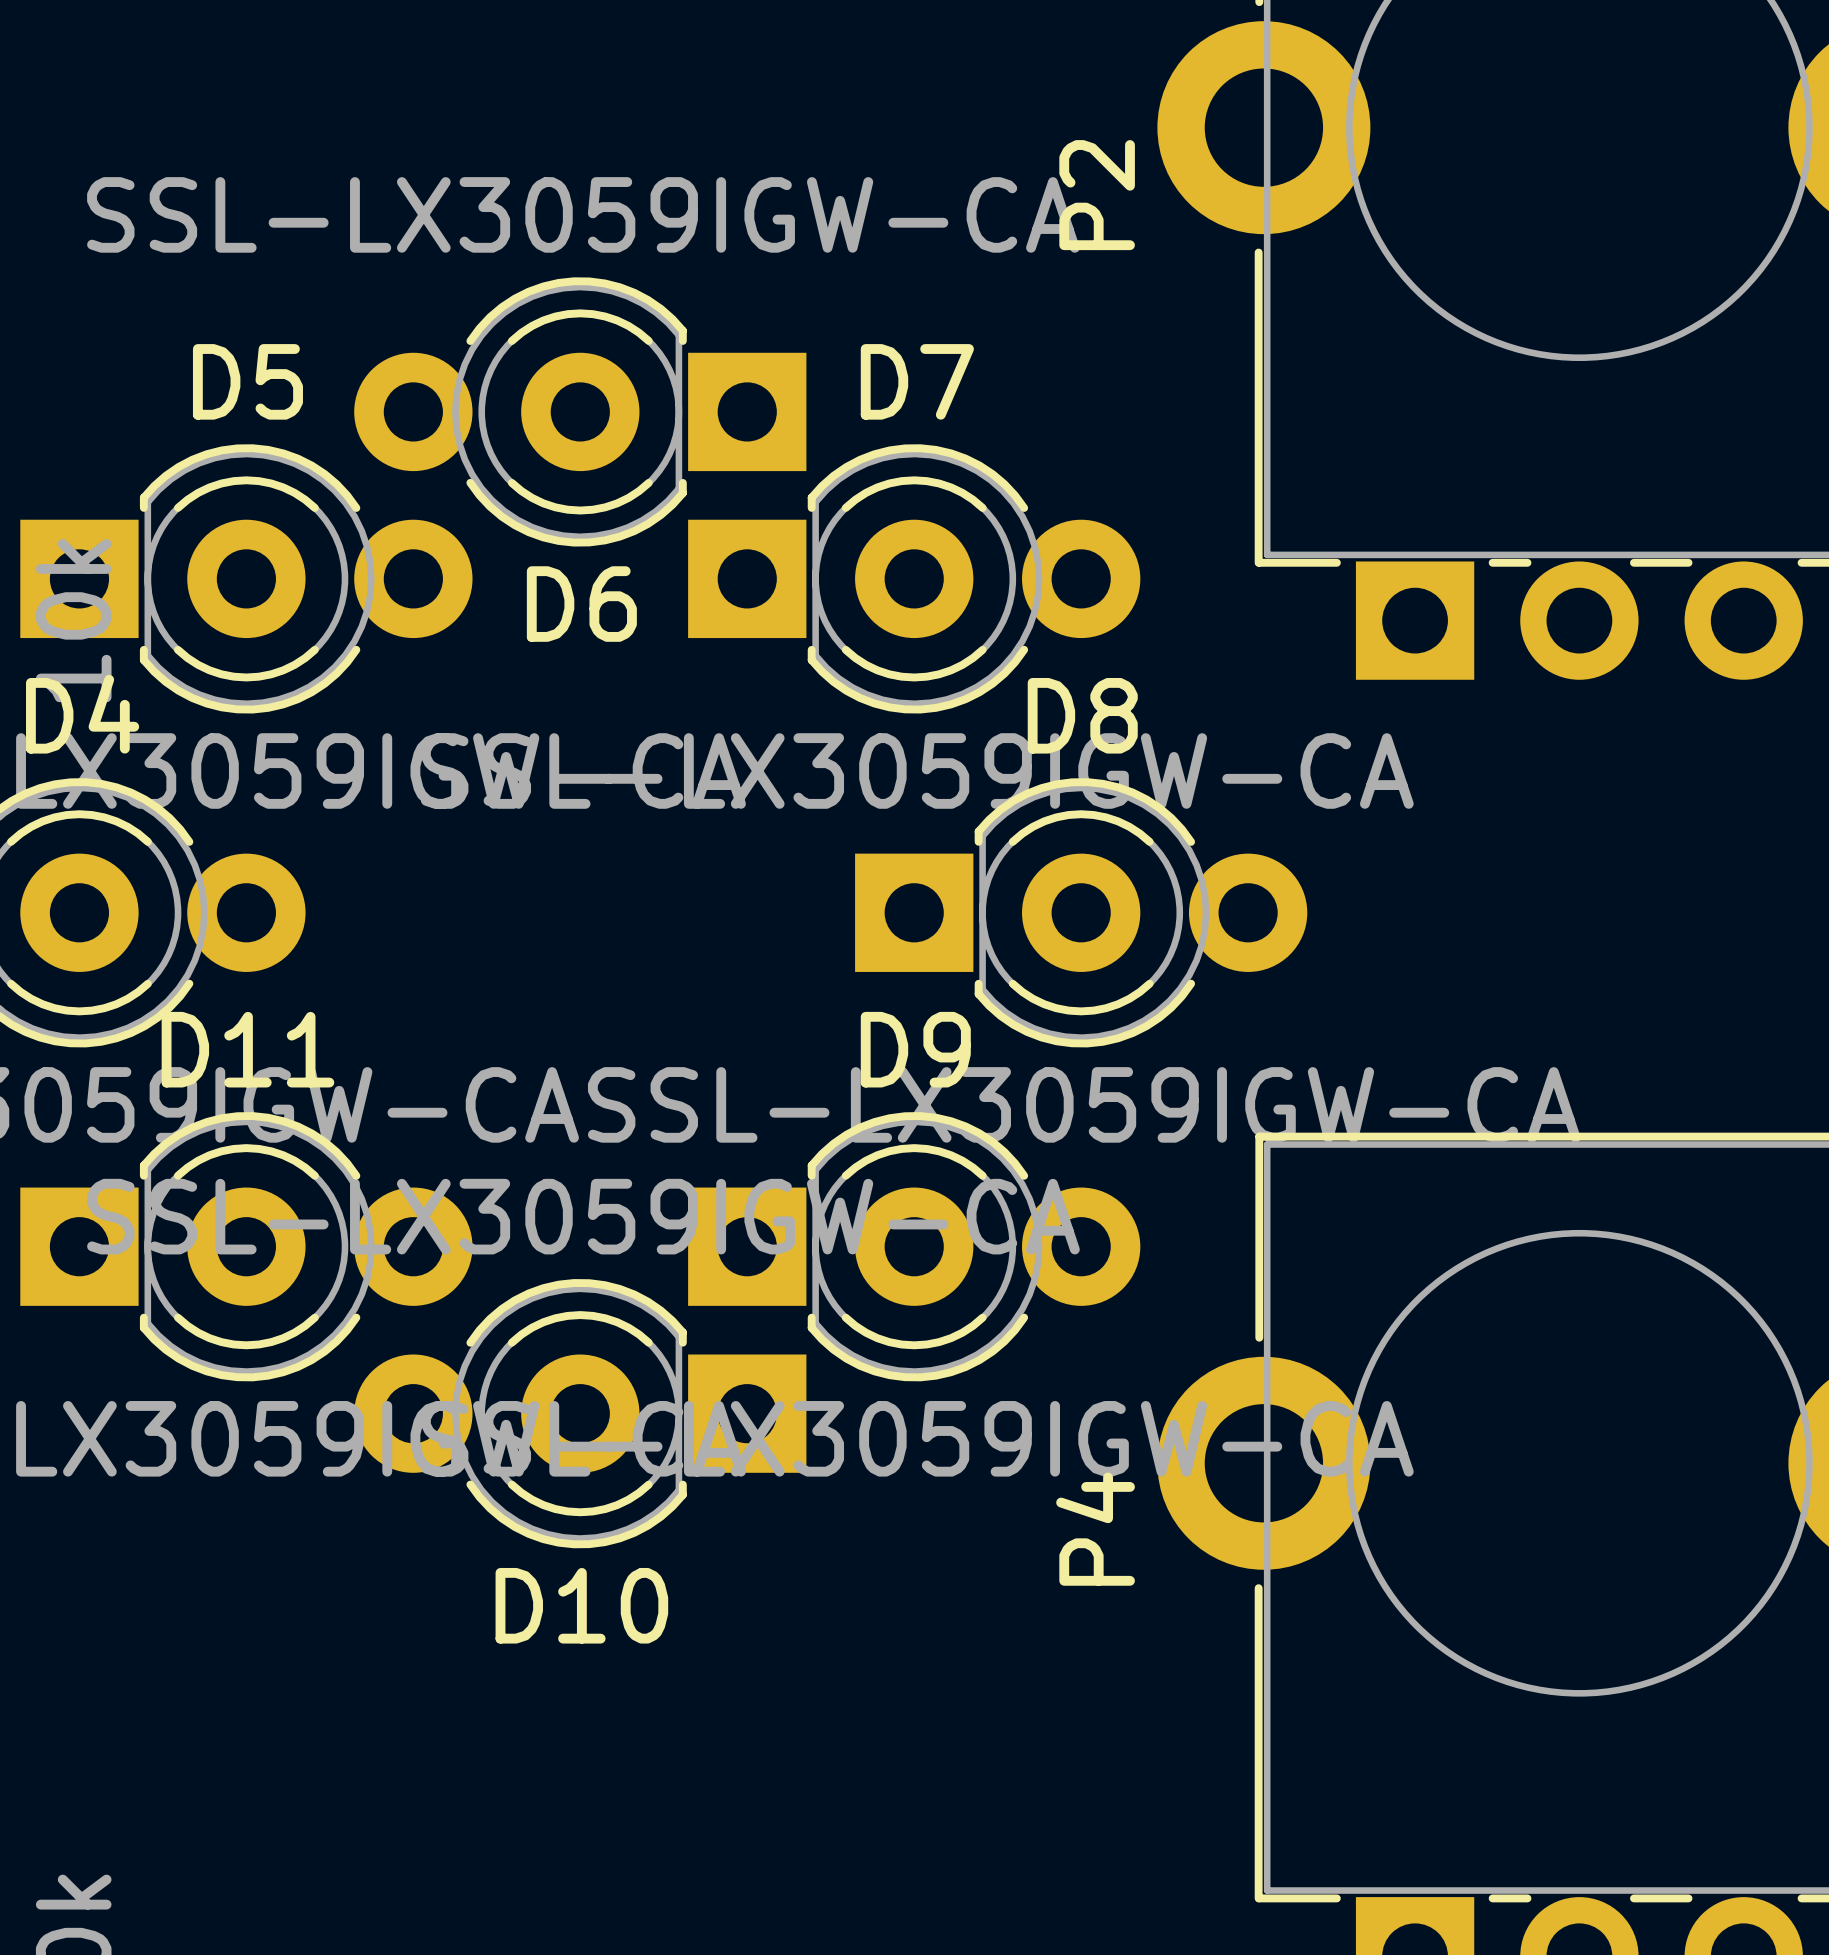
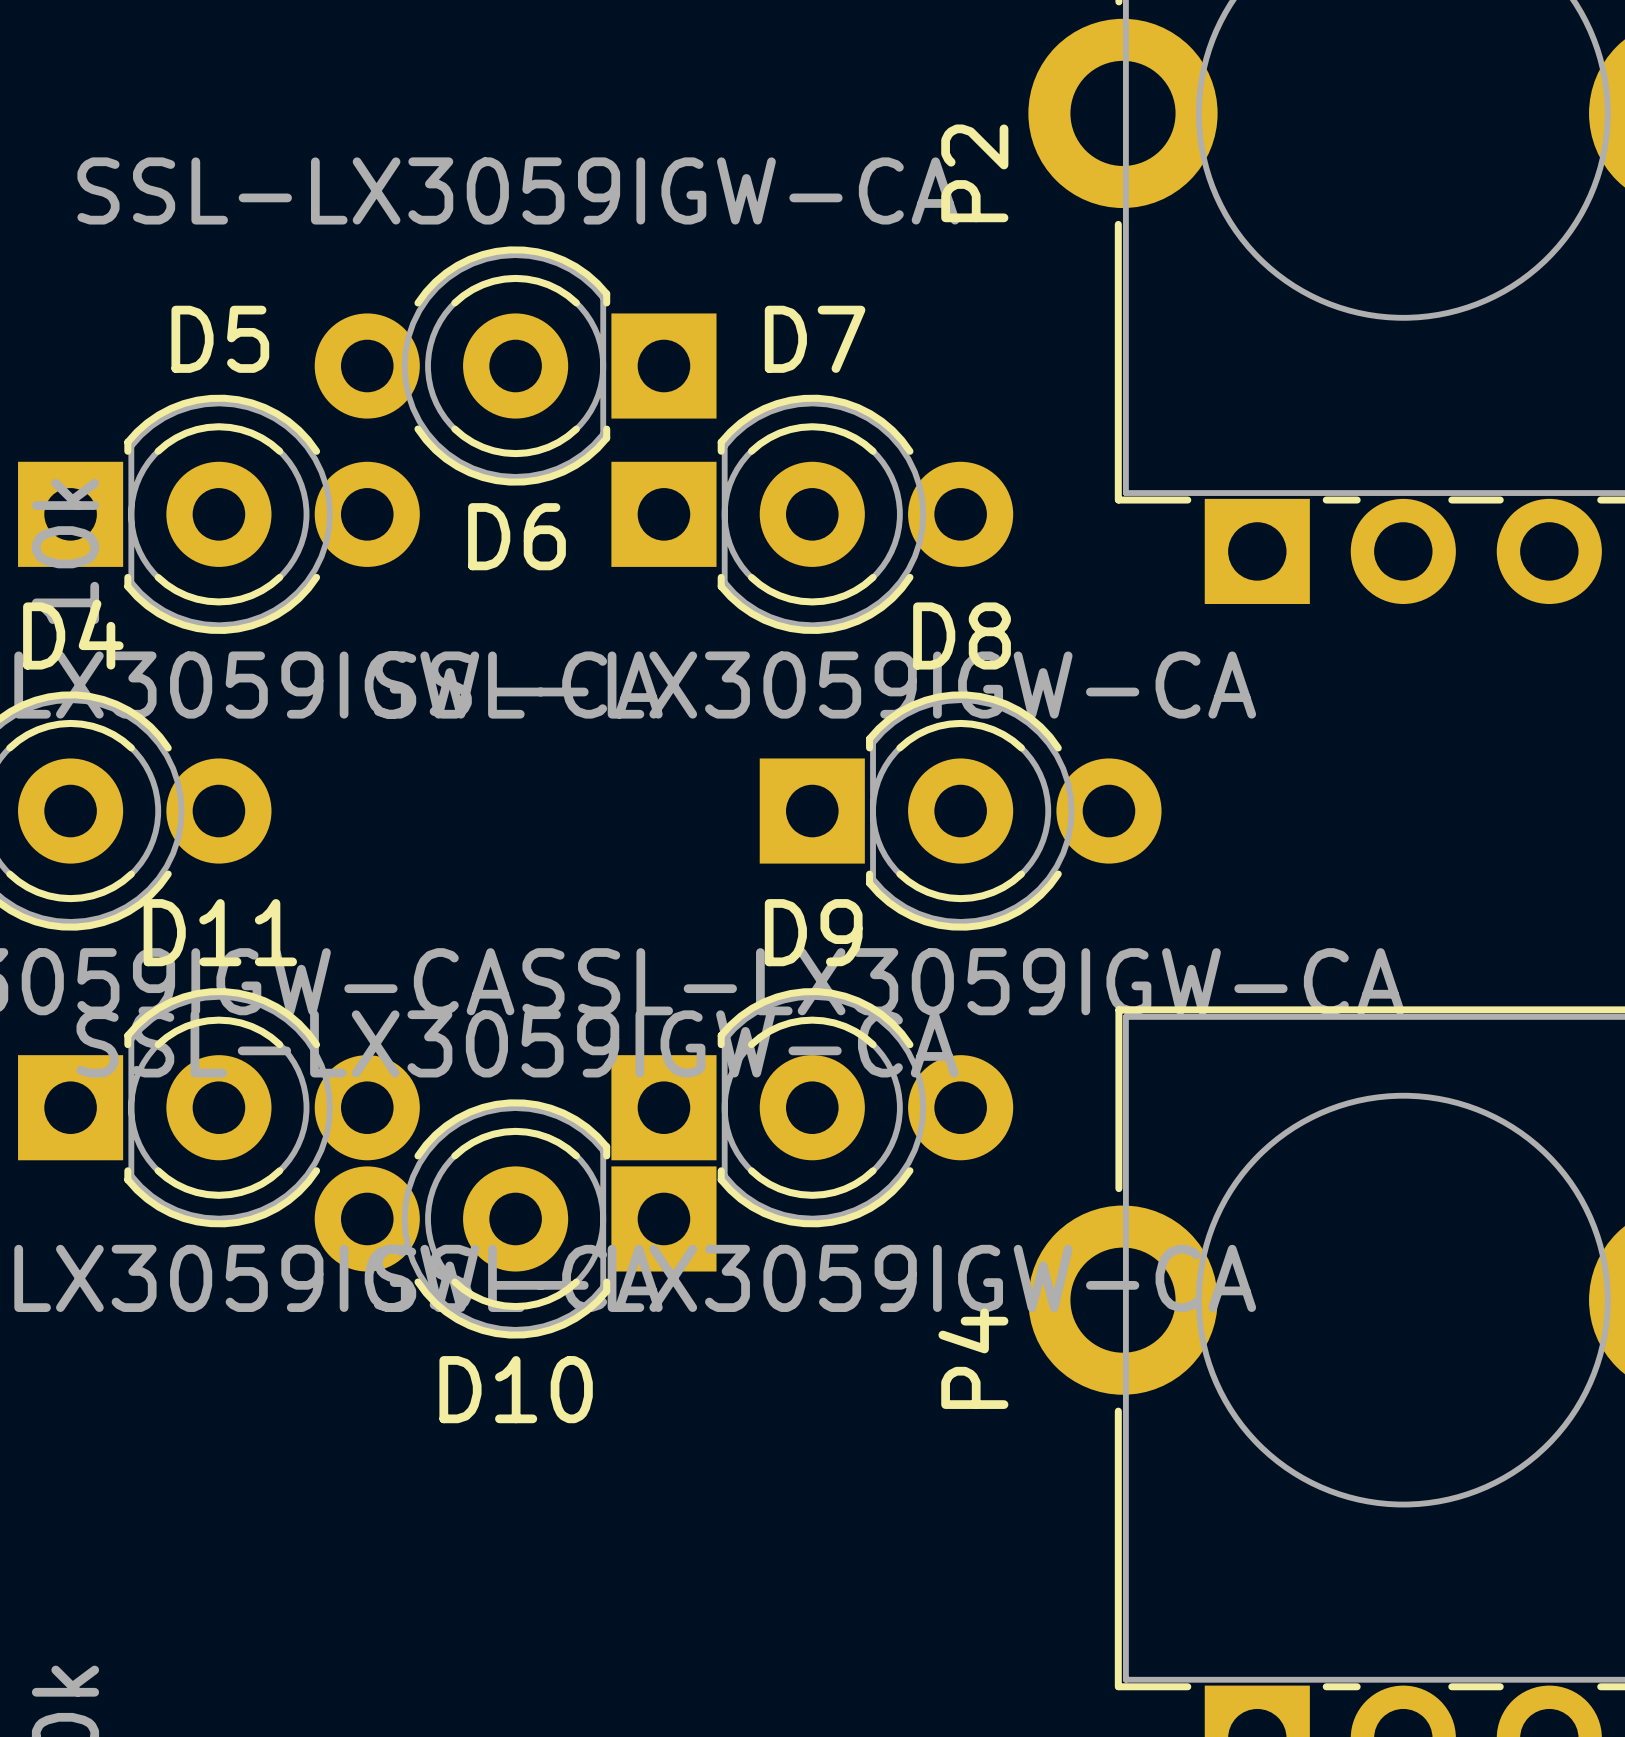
D10 position: (580, 1413) -> (515, 1218)

